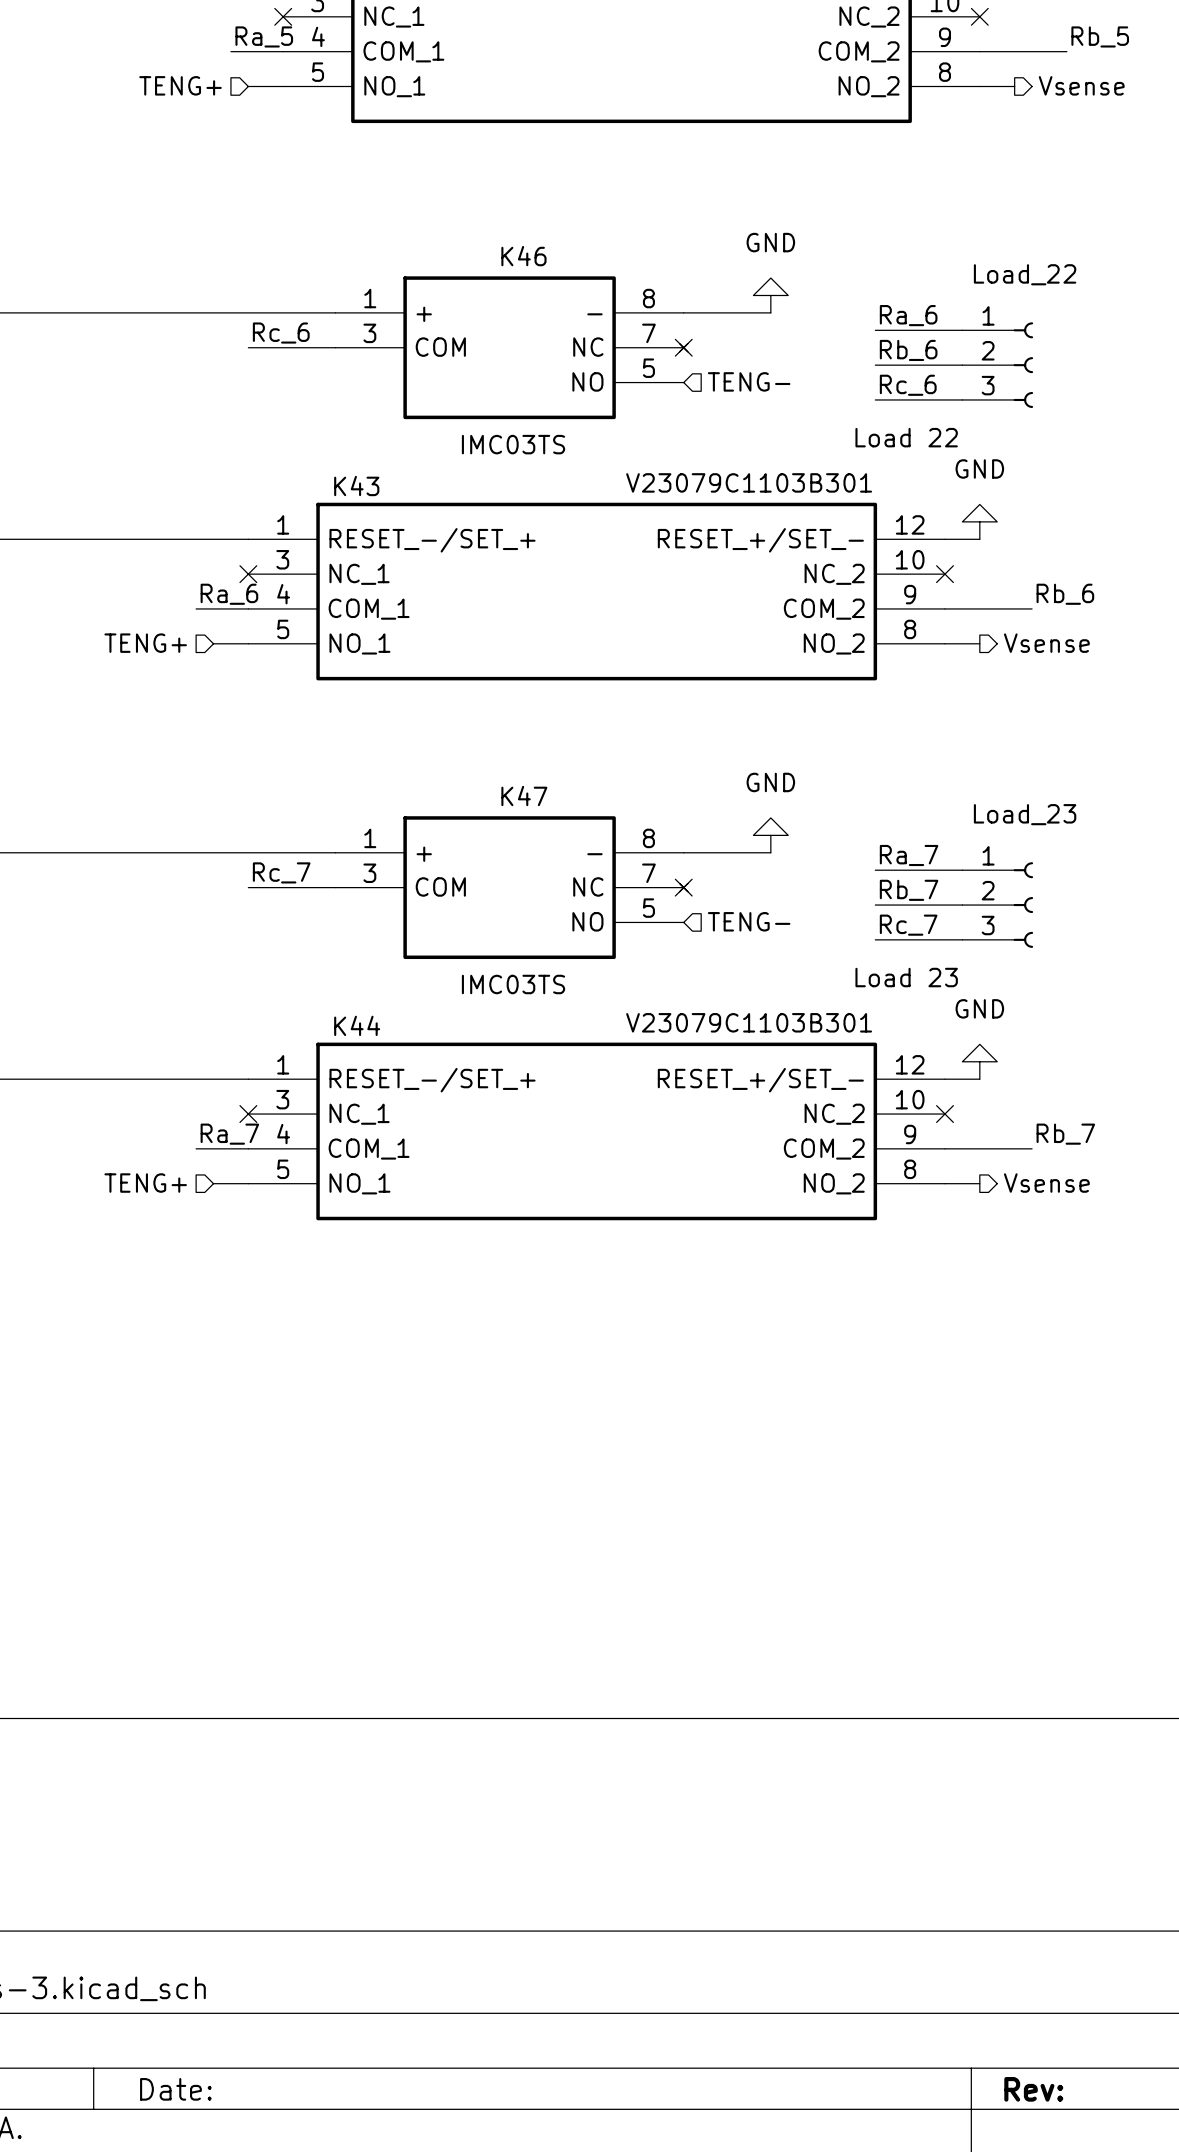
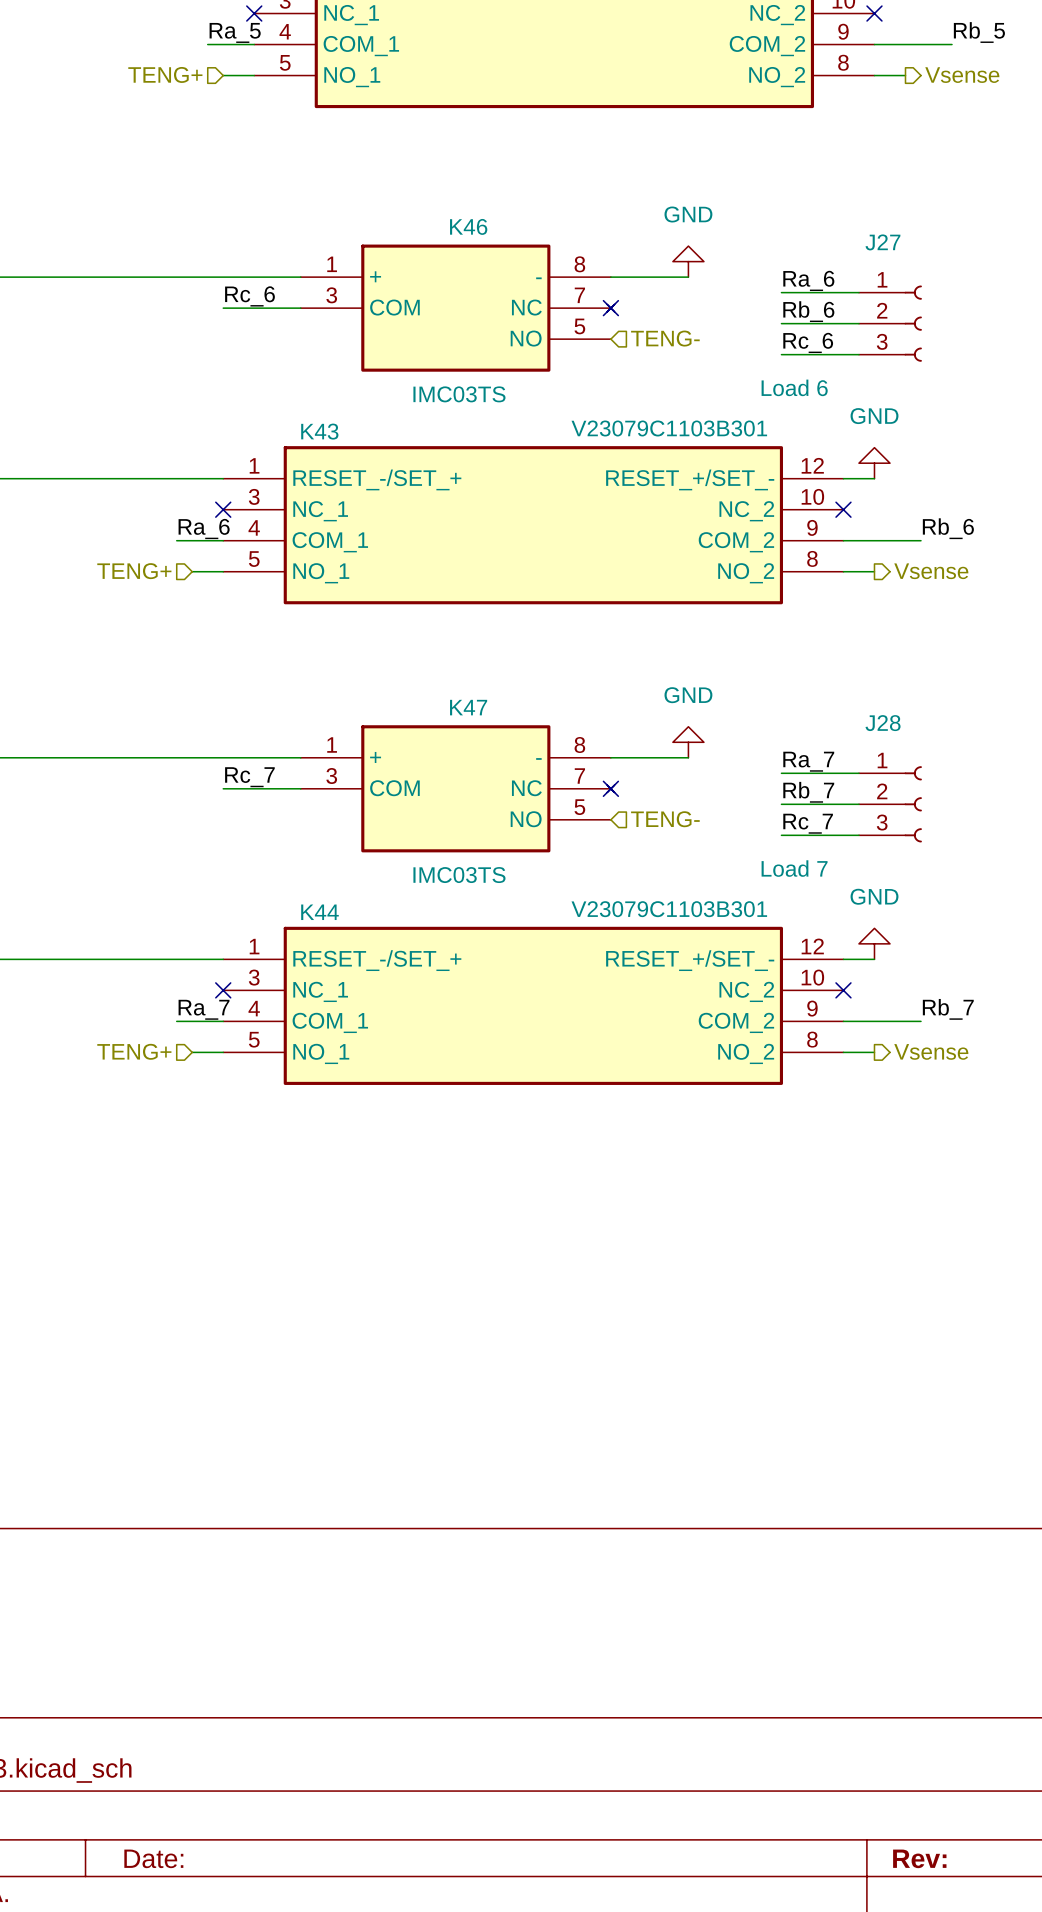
Load_22 name: Load_22 (1025, 274) -> J27 (882, 242)
Load_22 value: Load 22 (906, 437) -> Load 6 (794, 387)
Load_23 name: Load_23 (1025, 814) -> J28 (883, 723)
Load_23 value: Load 23 (906, 977) -> Load 7 (794, 868)

